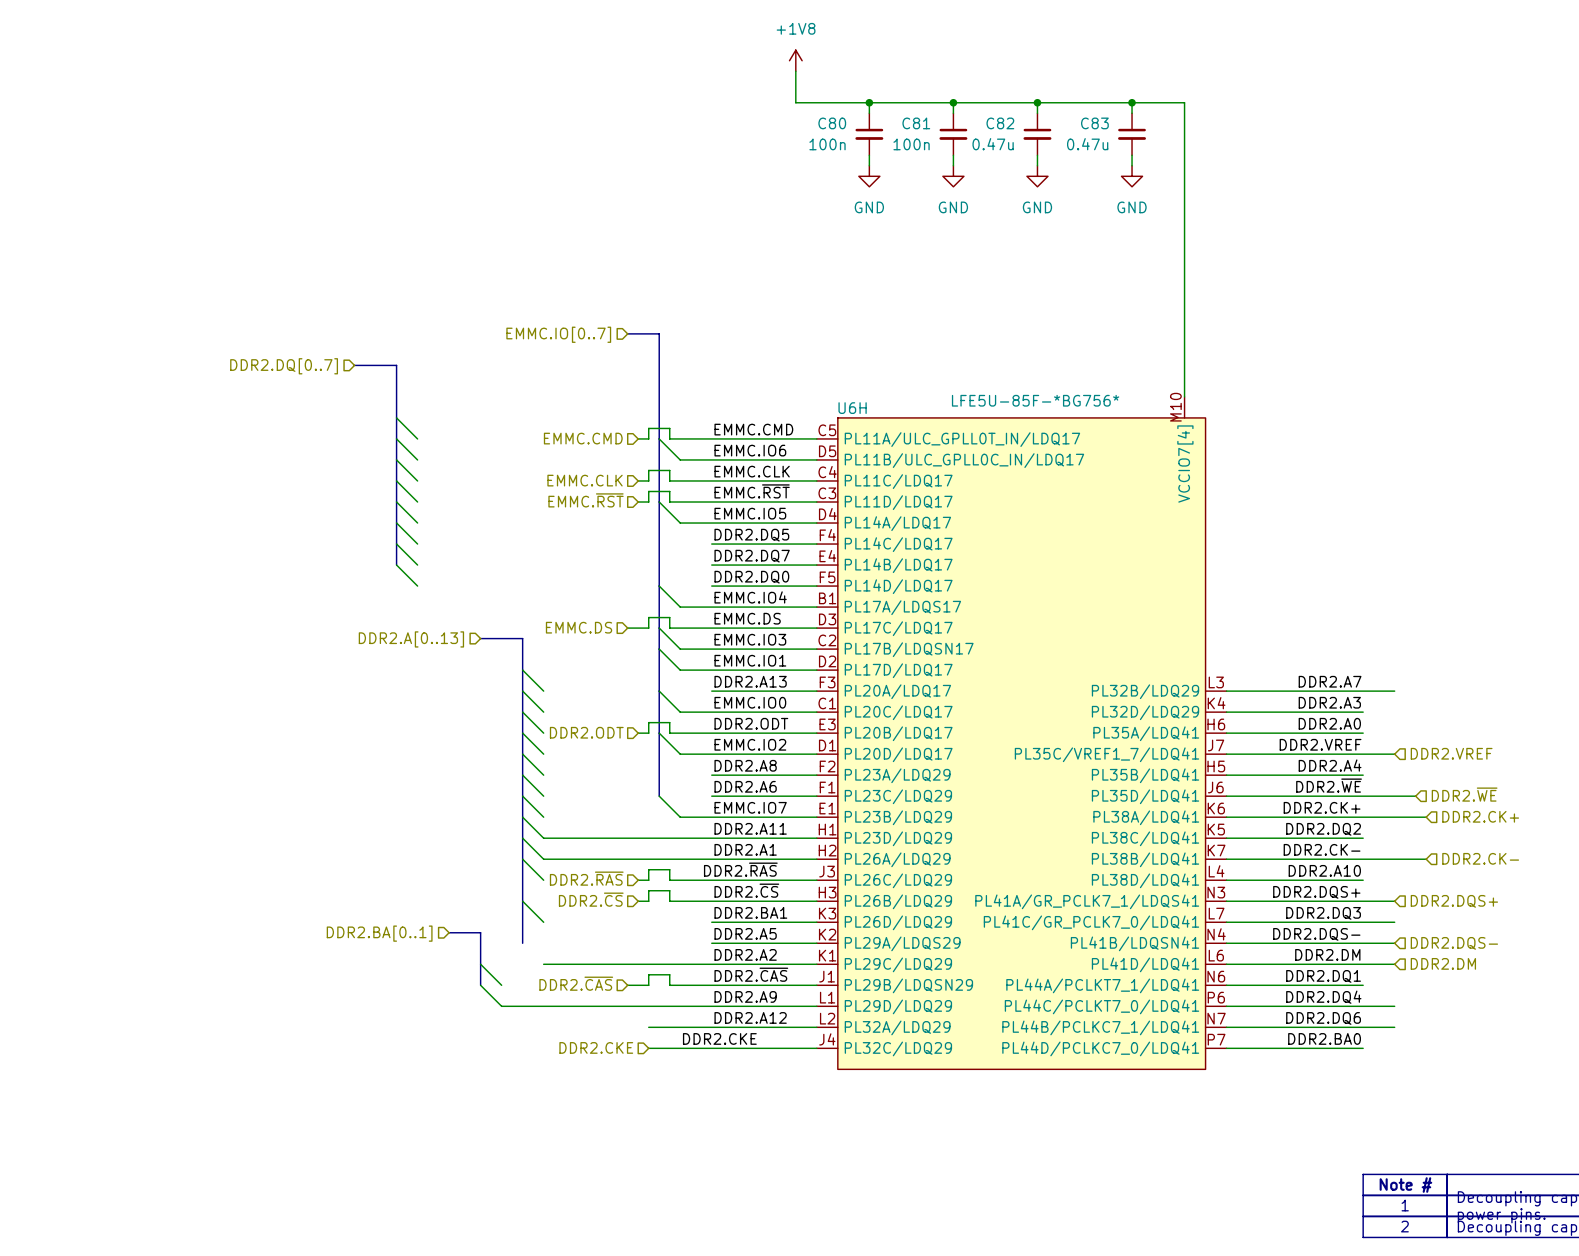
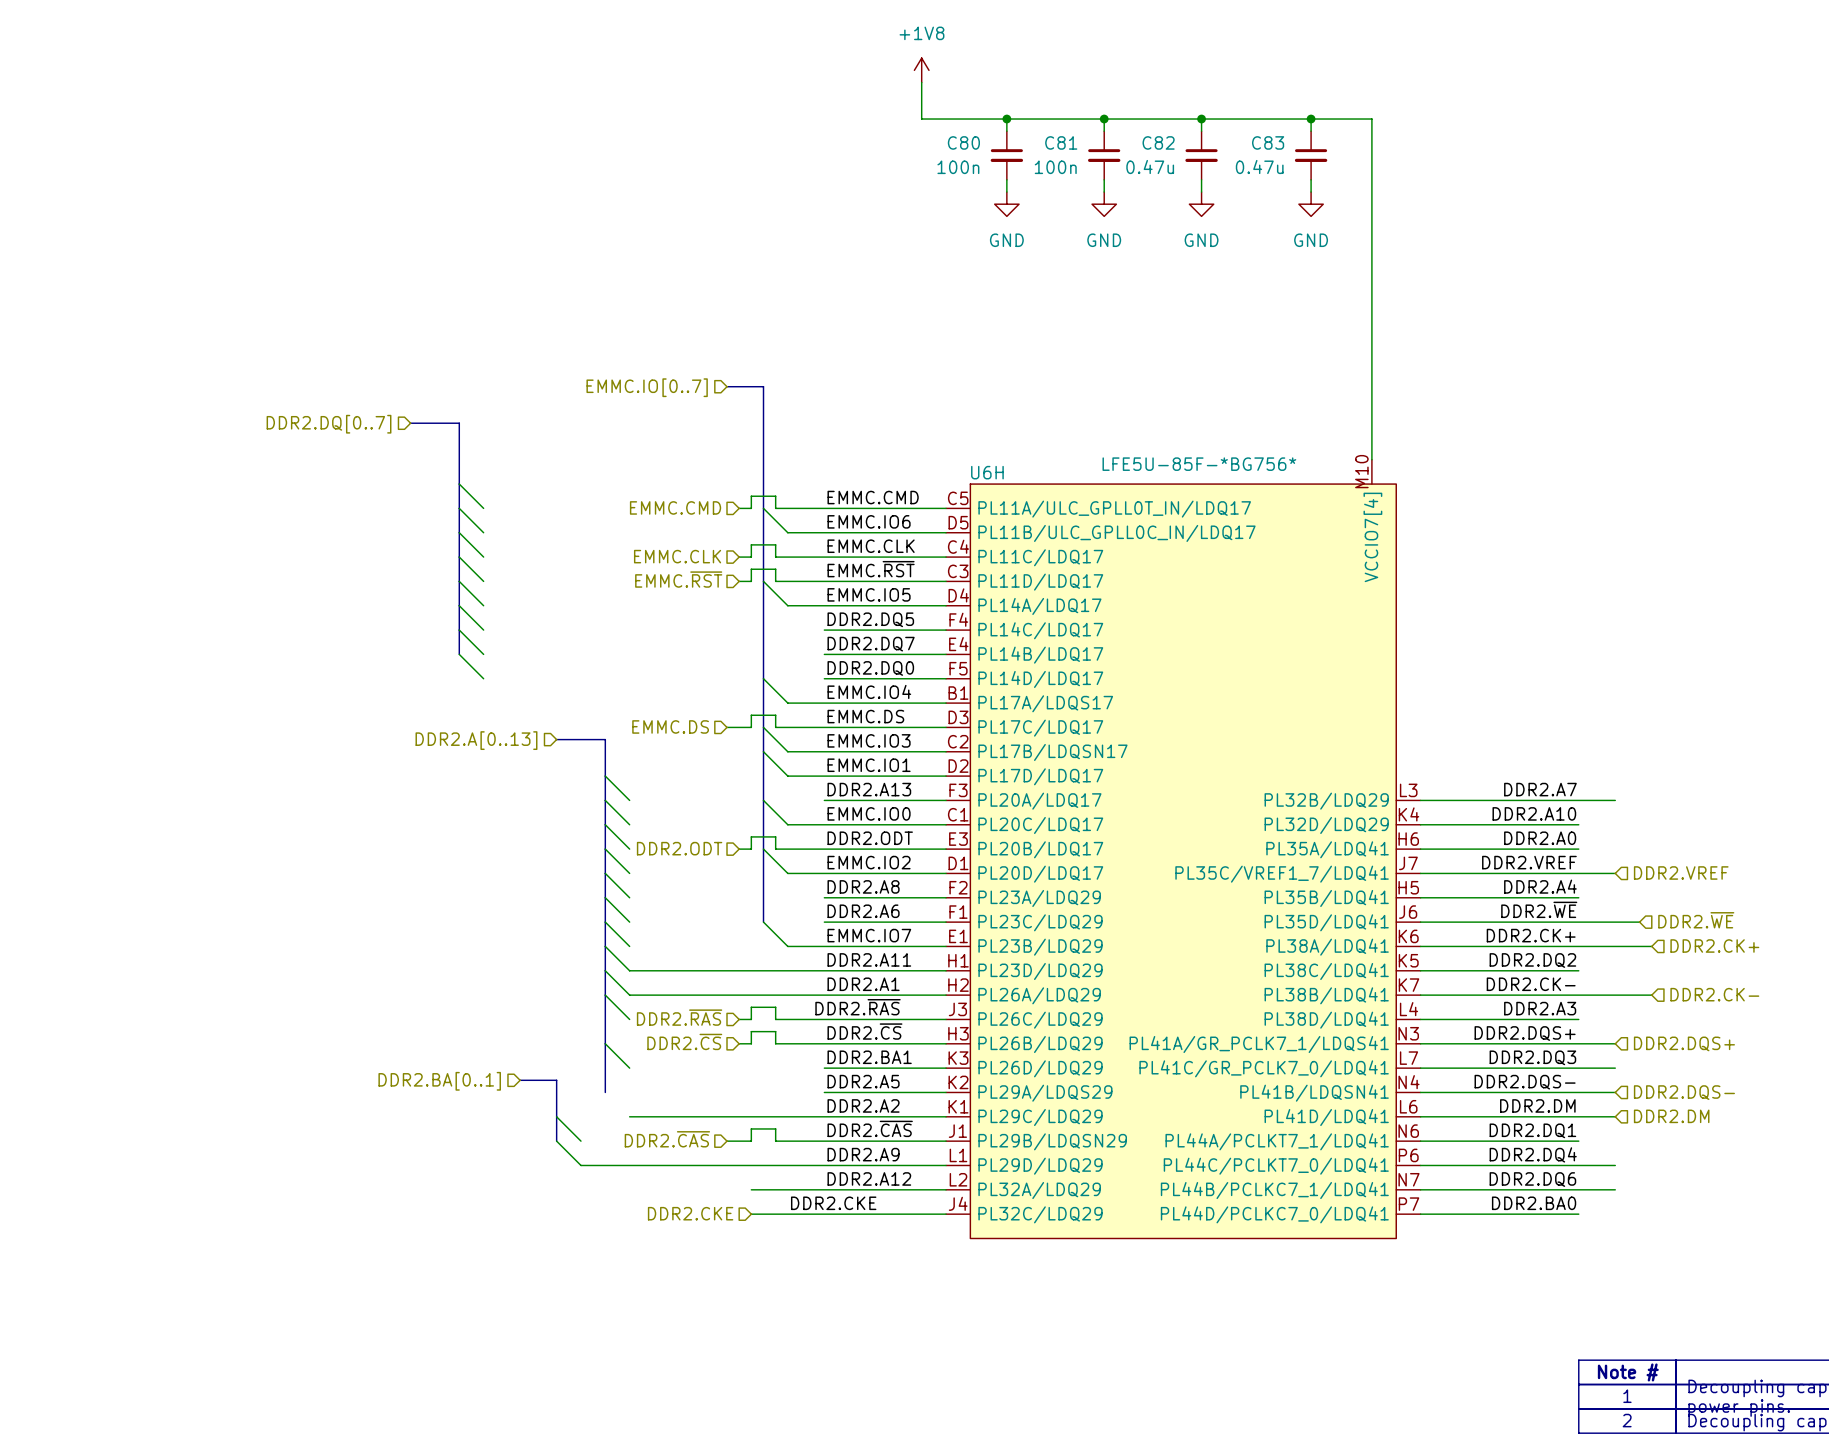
label: DDR2.A3 (1329, 702) -> DDR2.A10 (1534, 813)
label: DDR2.A10 (1324, 870) -> DDR2.A3 (1540, 1008)

